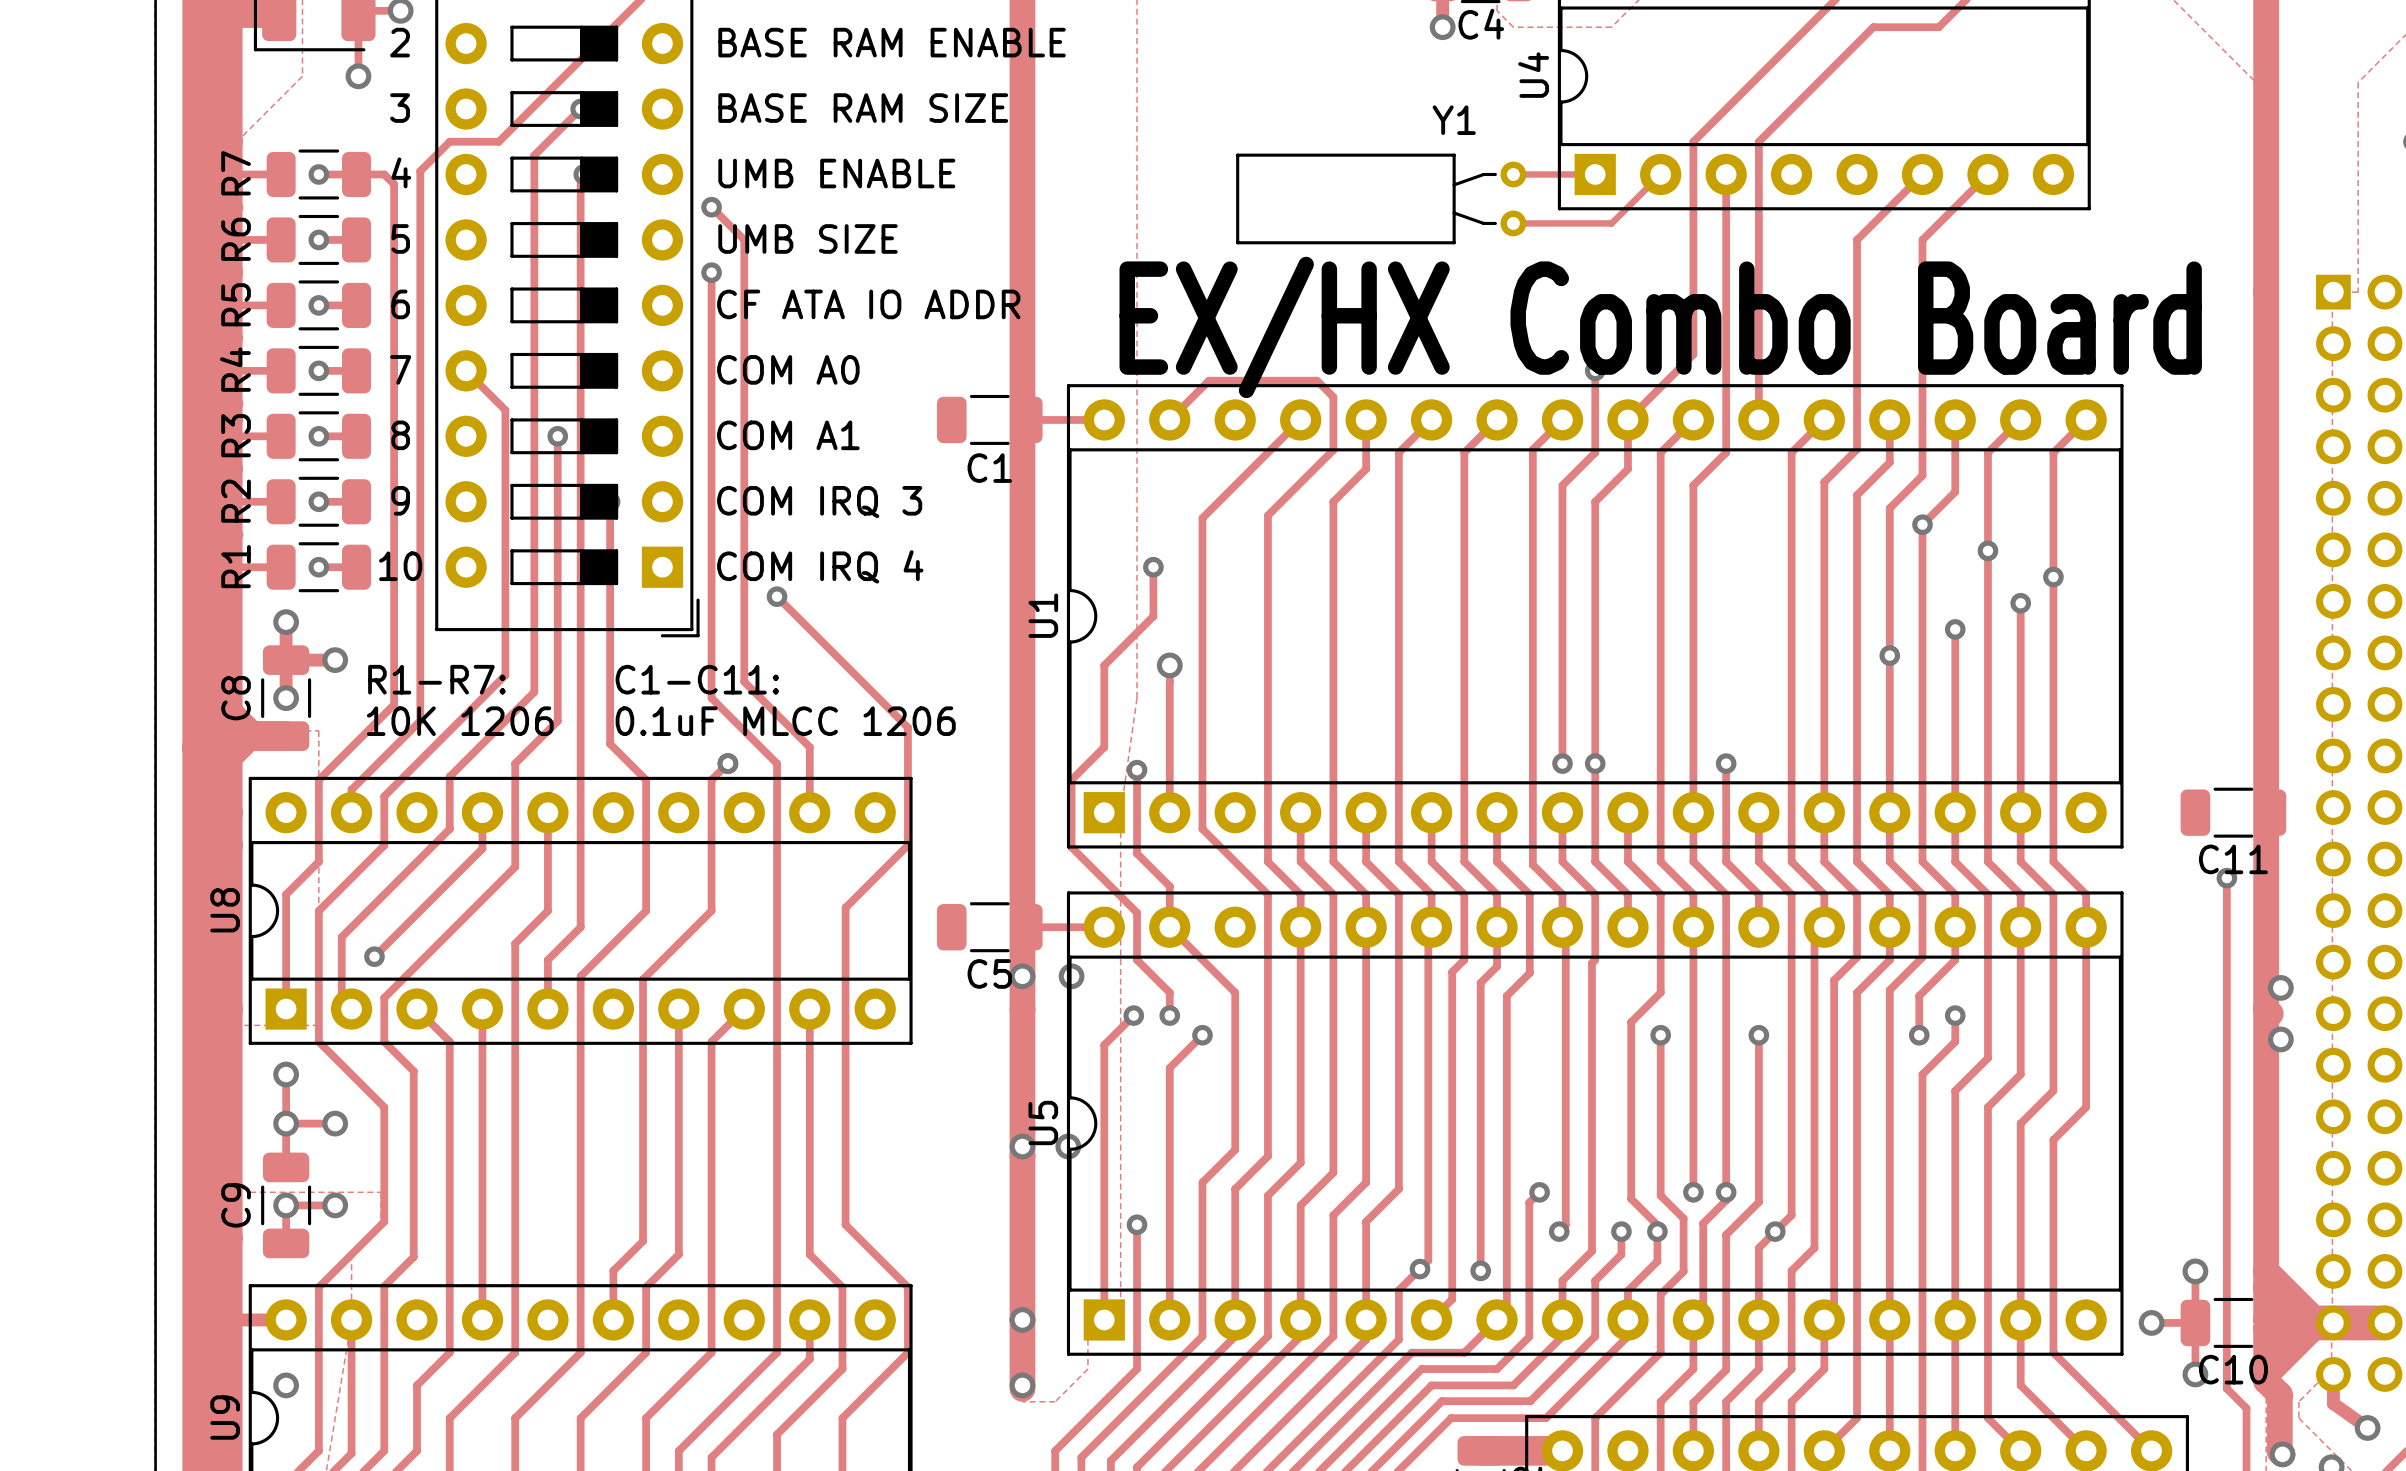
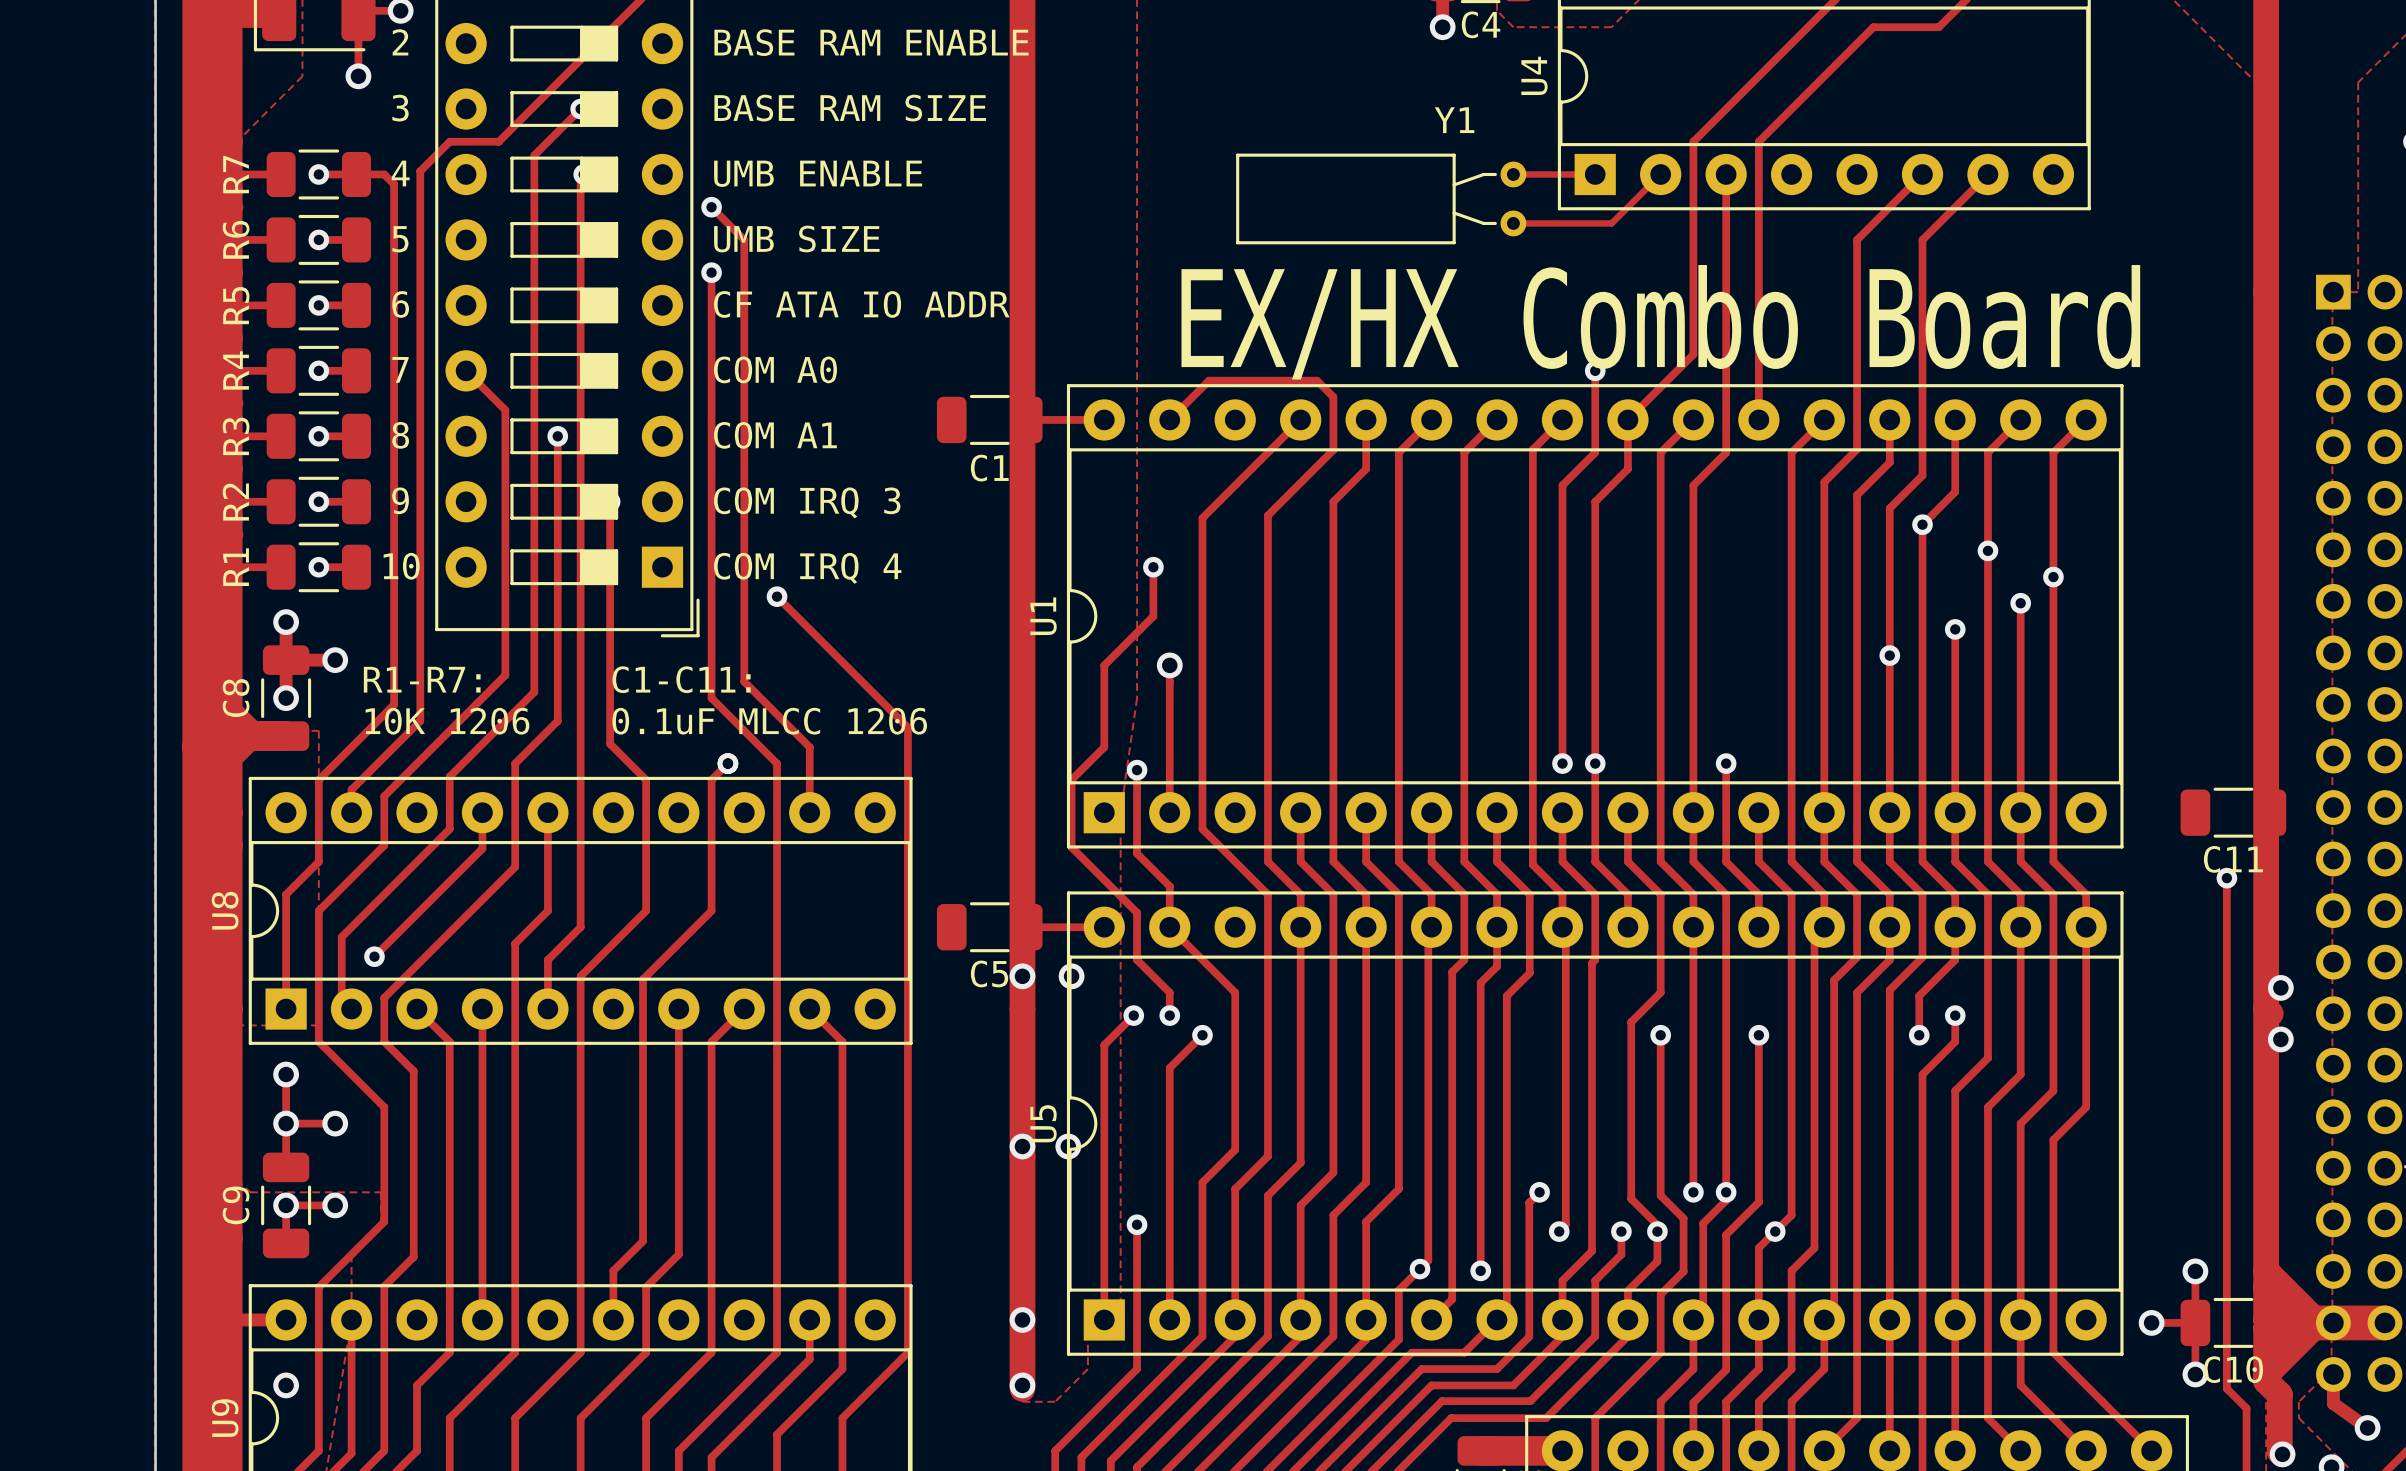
track: (907, 845) (845, 907) (845, 1224) (907, 1287) -> (907, 845) (907, 1287)
track: (809, 1009) (809, 1254) (842, 1287) -> (809, 1009) (842, 1041) (842, 1287)

